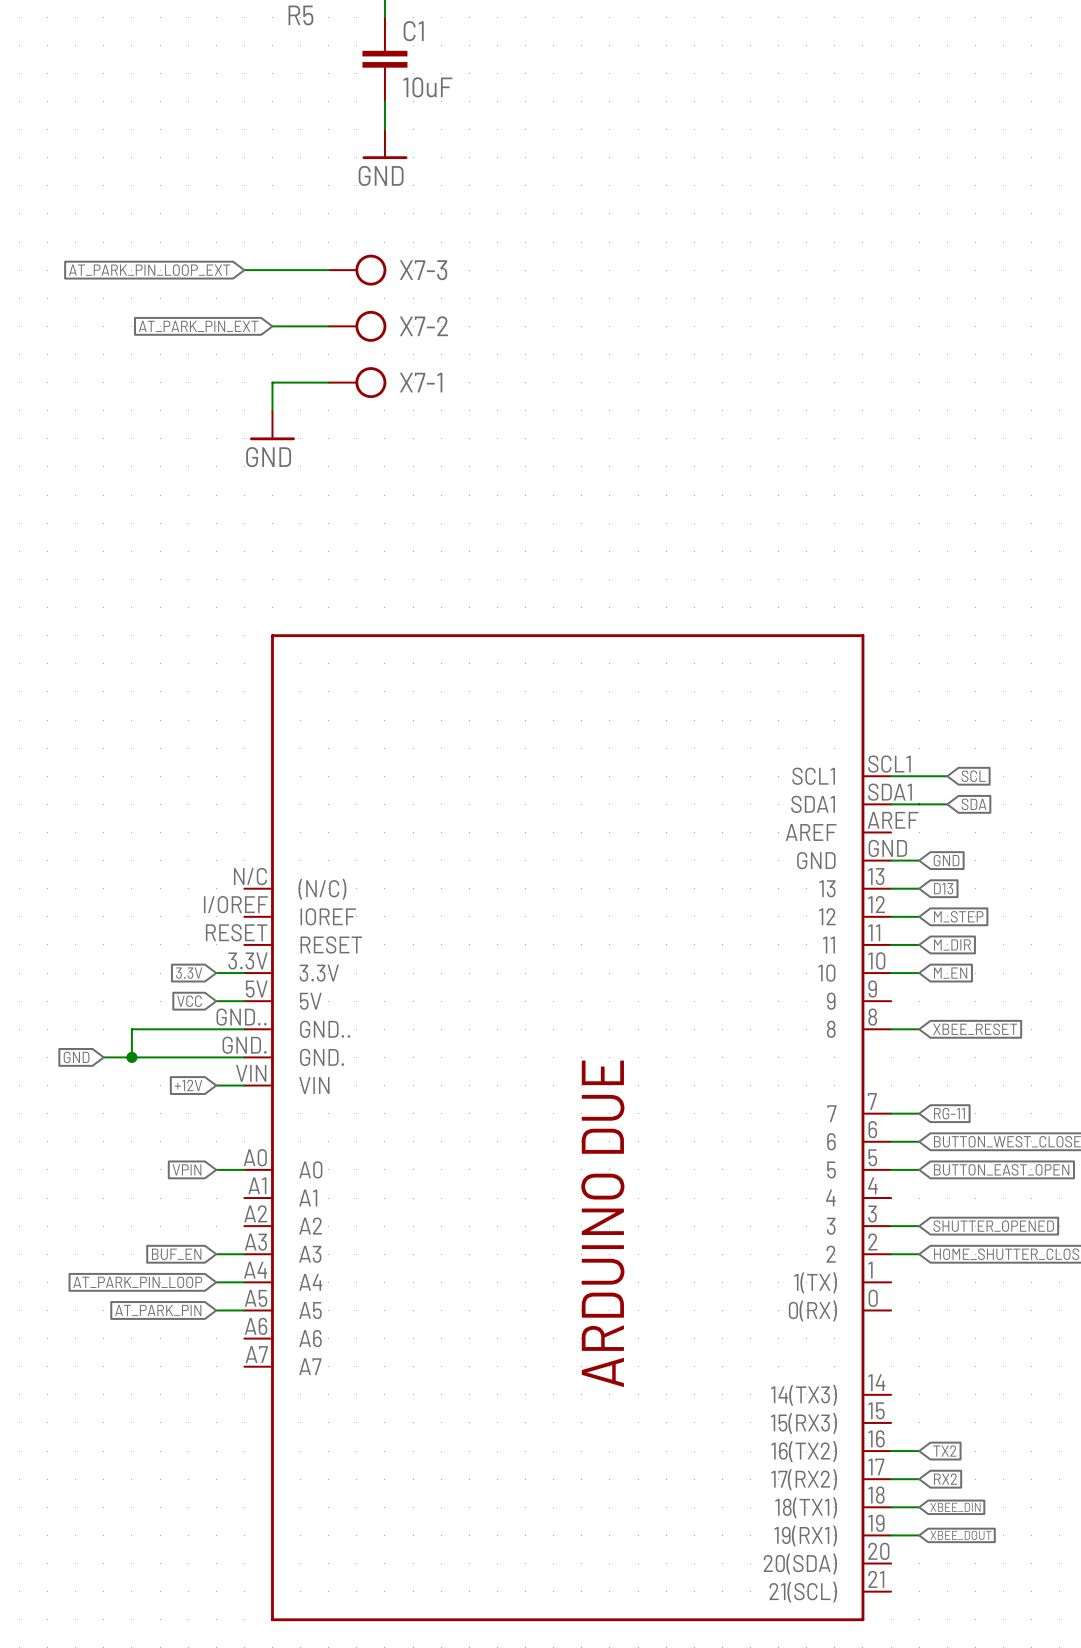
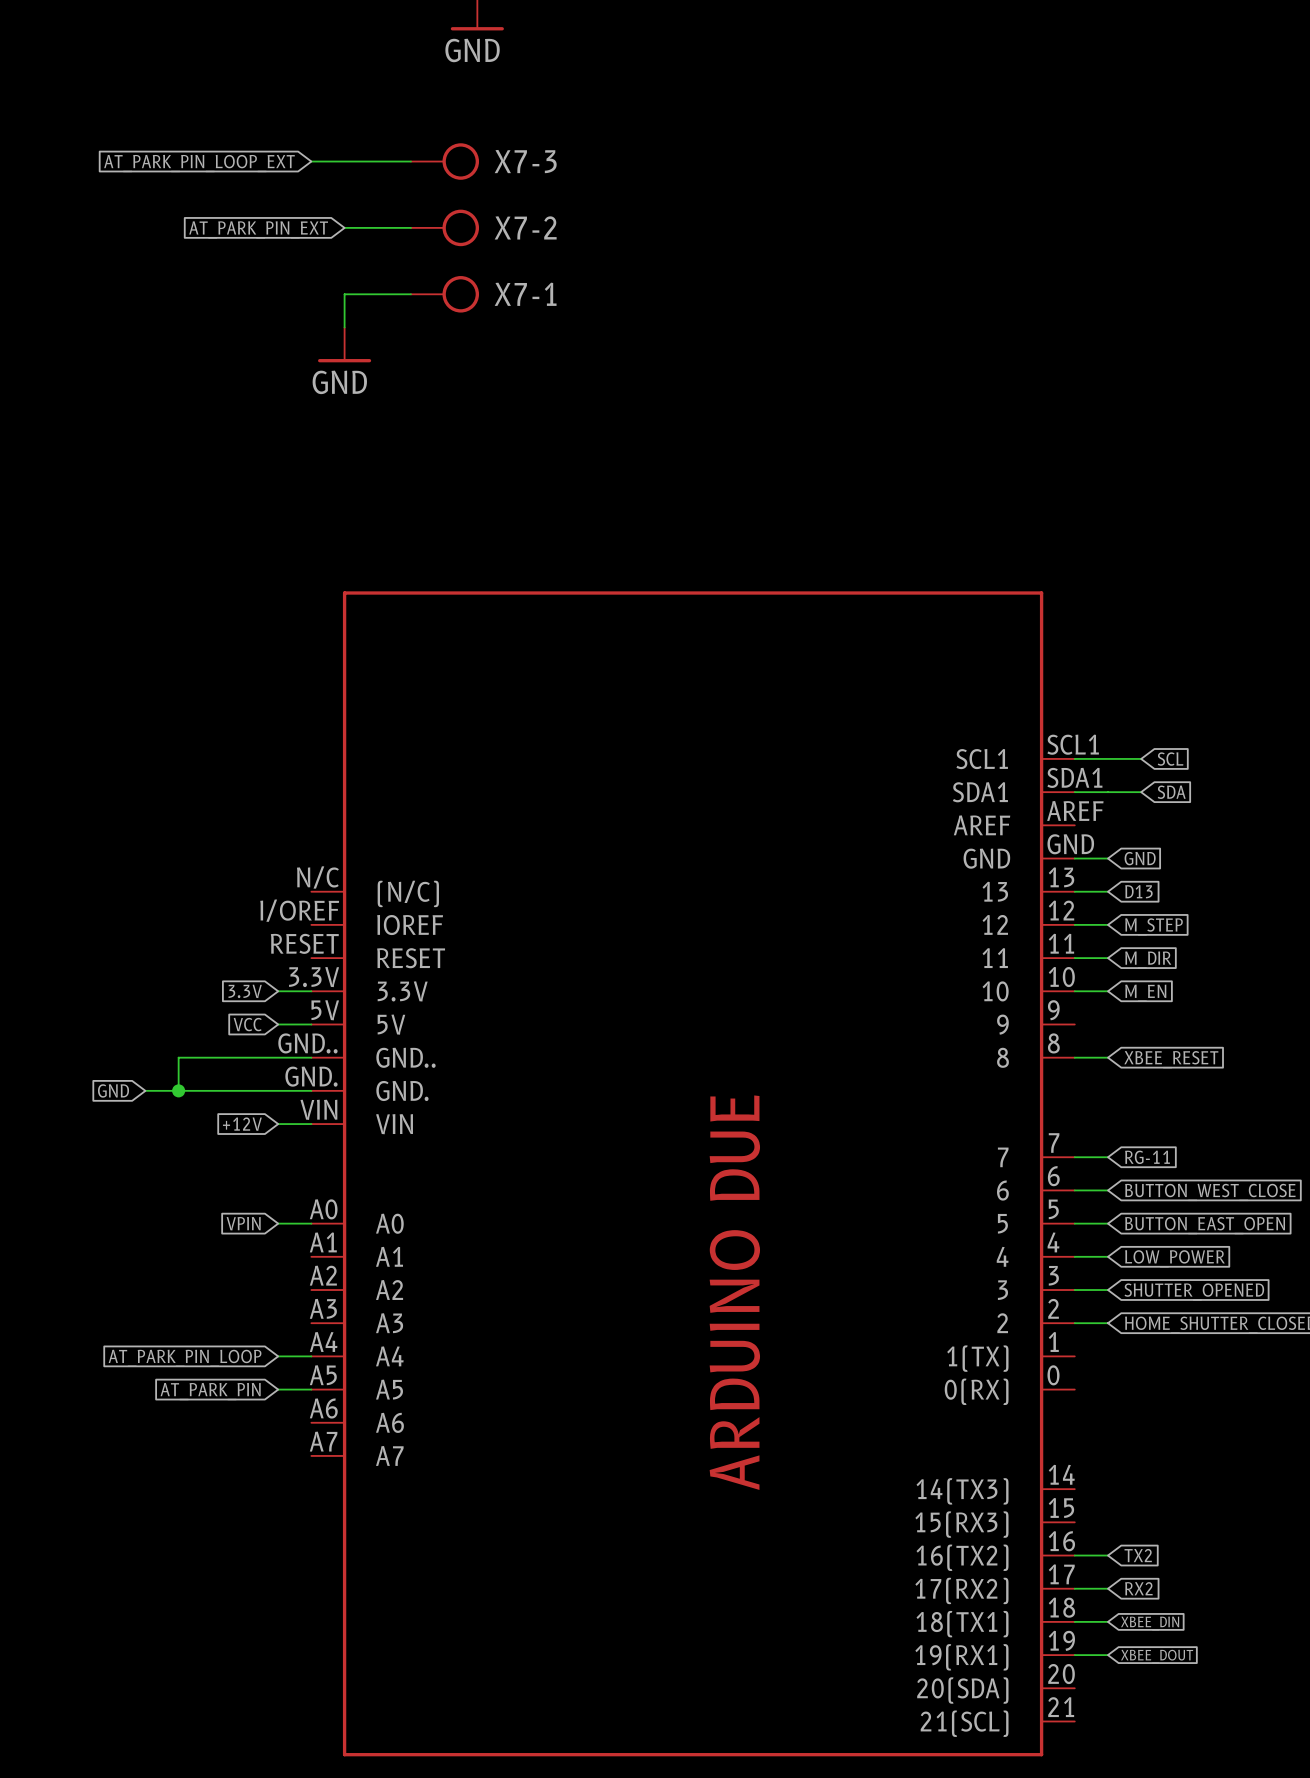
wire: none -> (1074, 1256) (1107, 1256)
global label: none -> LOW_POWER (1174, 1258)
global label: BUF_EN (176, 1254) -> none
wire: (216, 1254) (244, 1254) -> none

